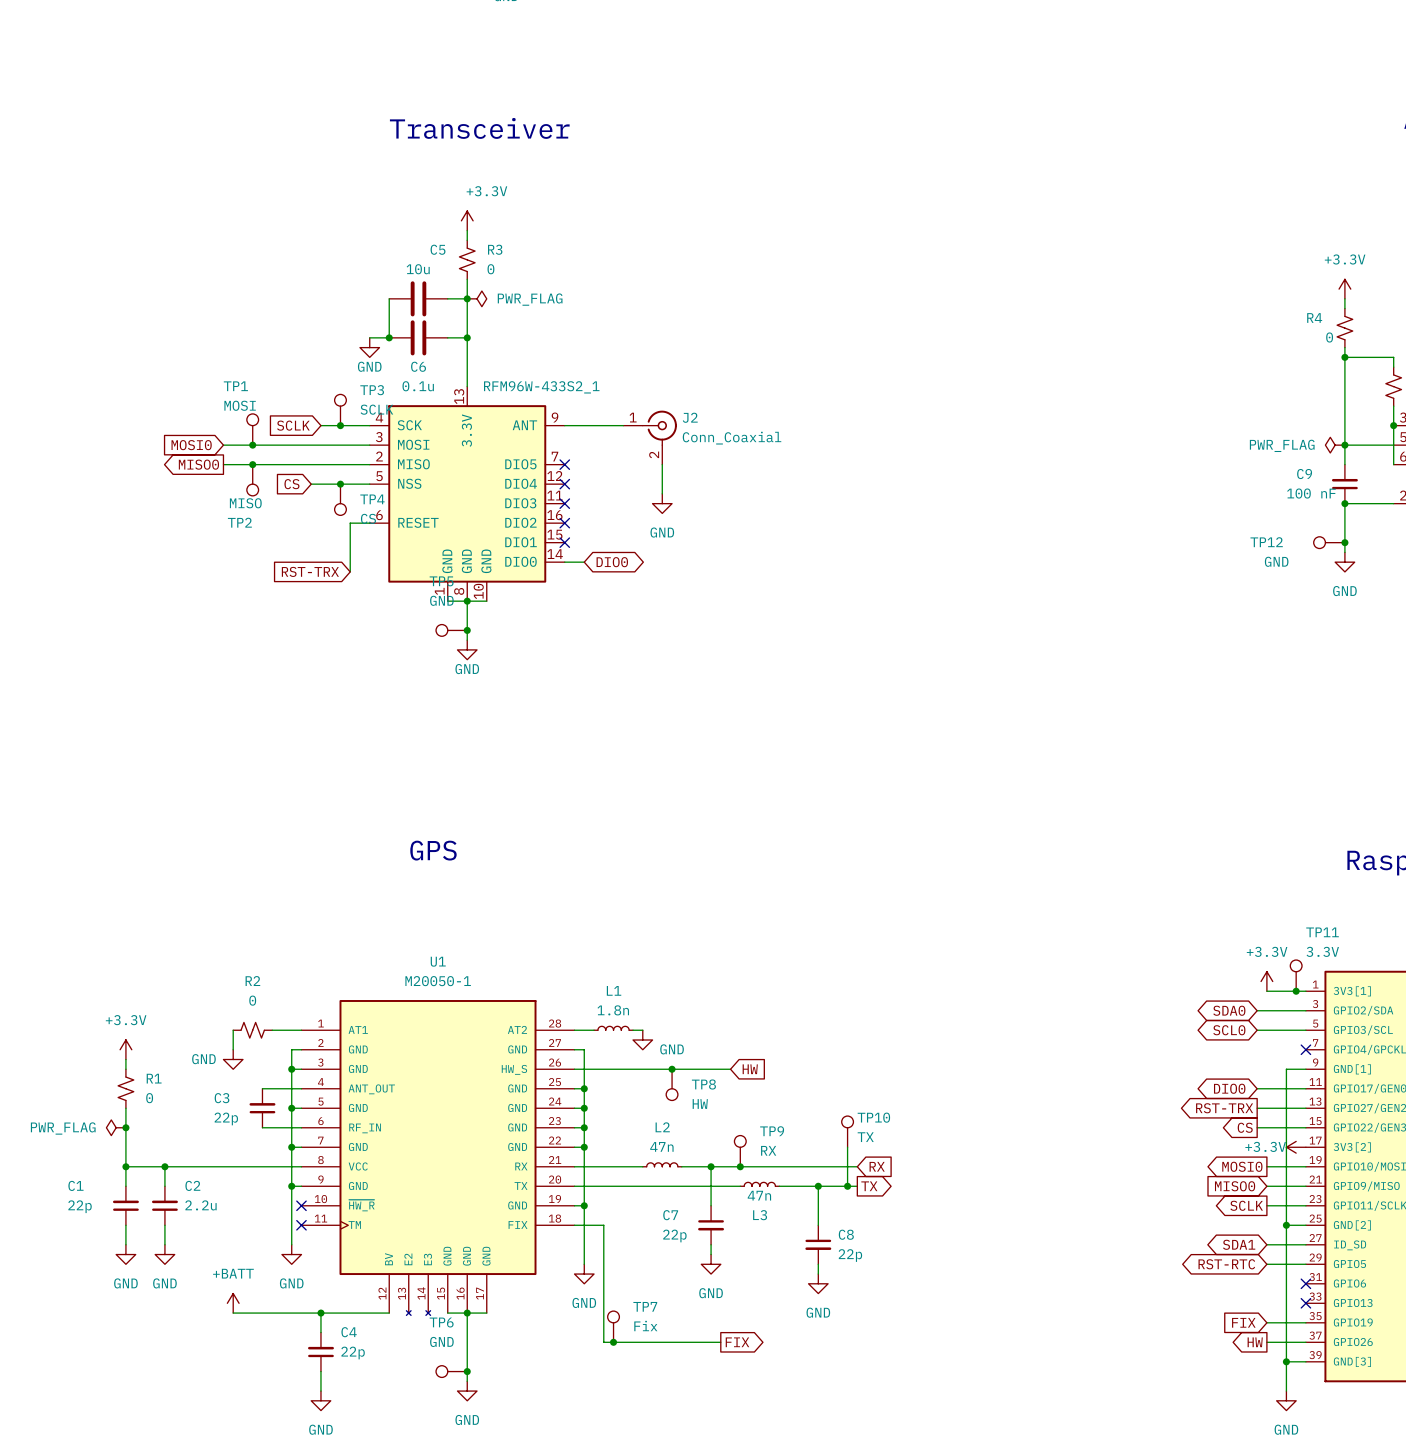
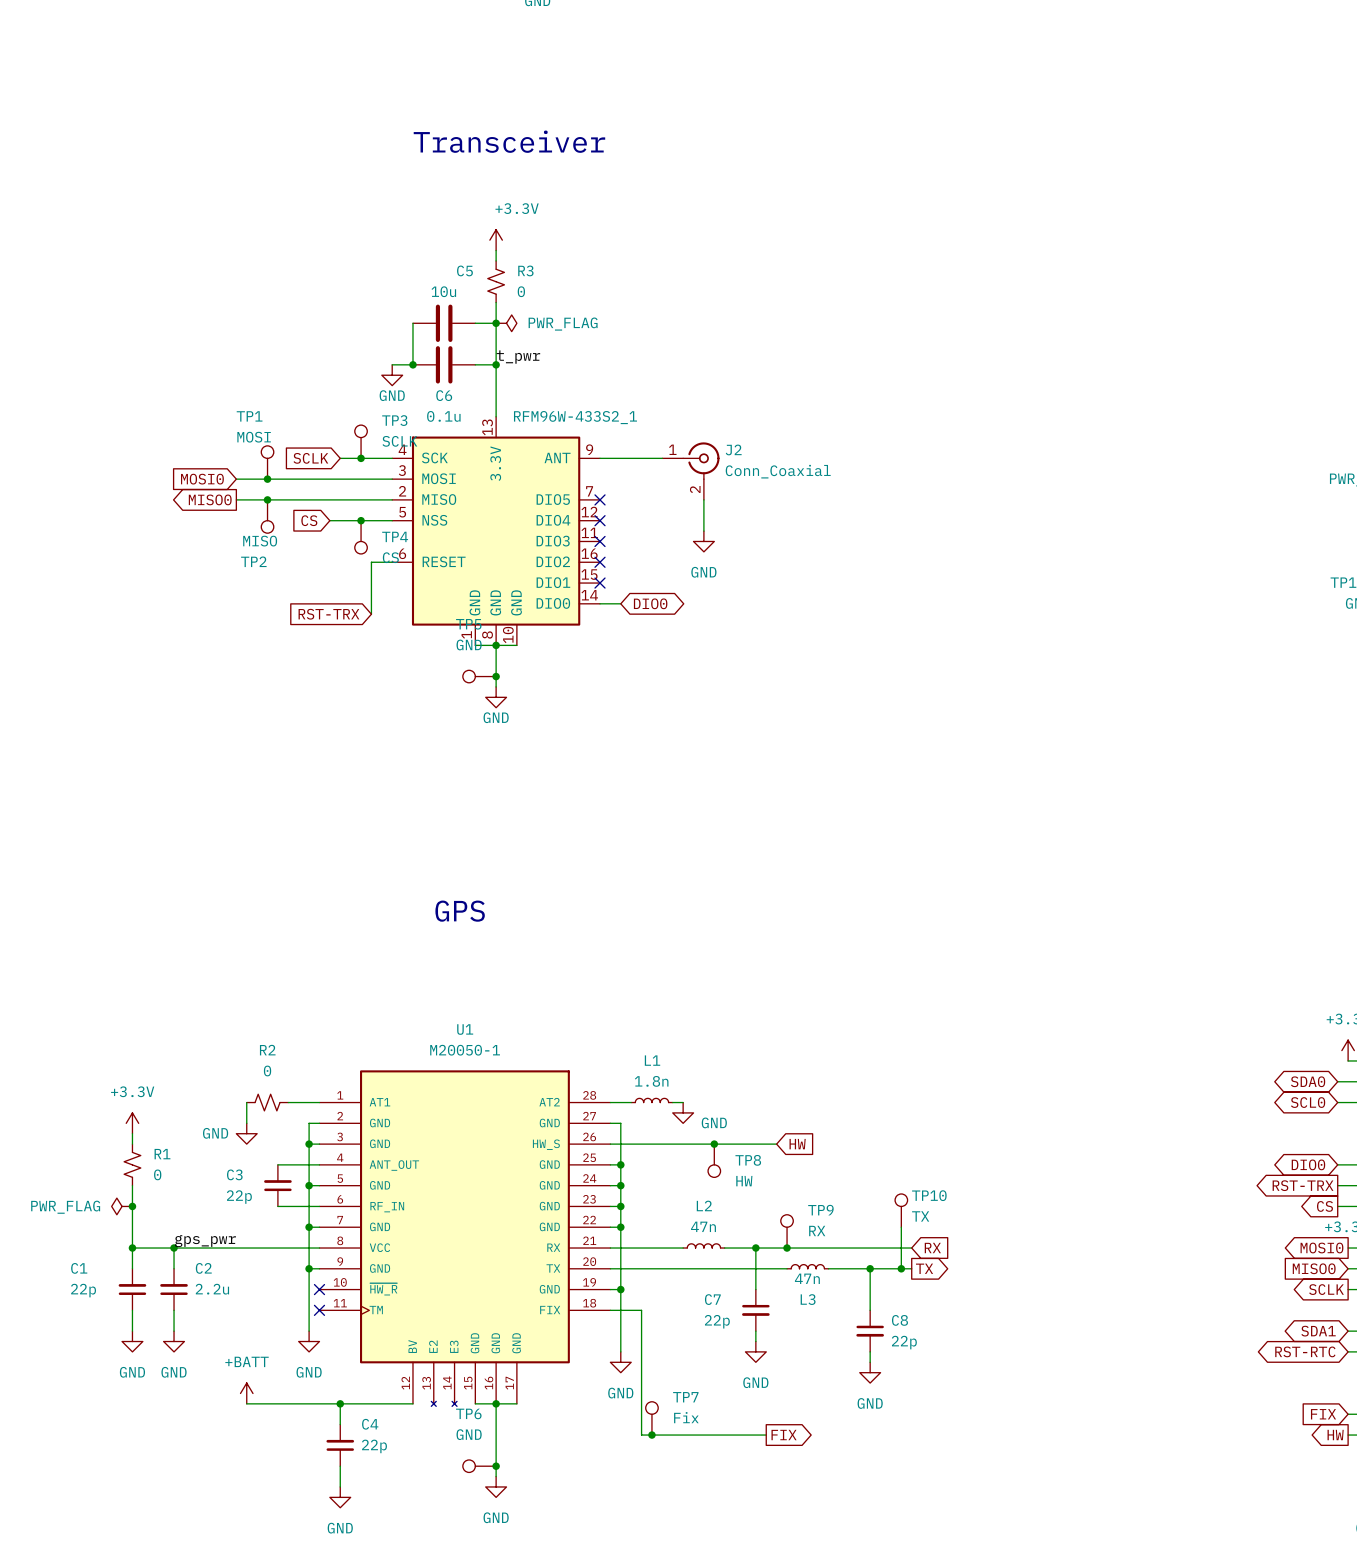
label: none -> t_pwr (518, 357)
label: none -> gps_pwr (205, 1241)

